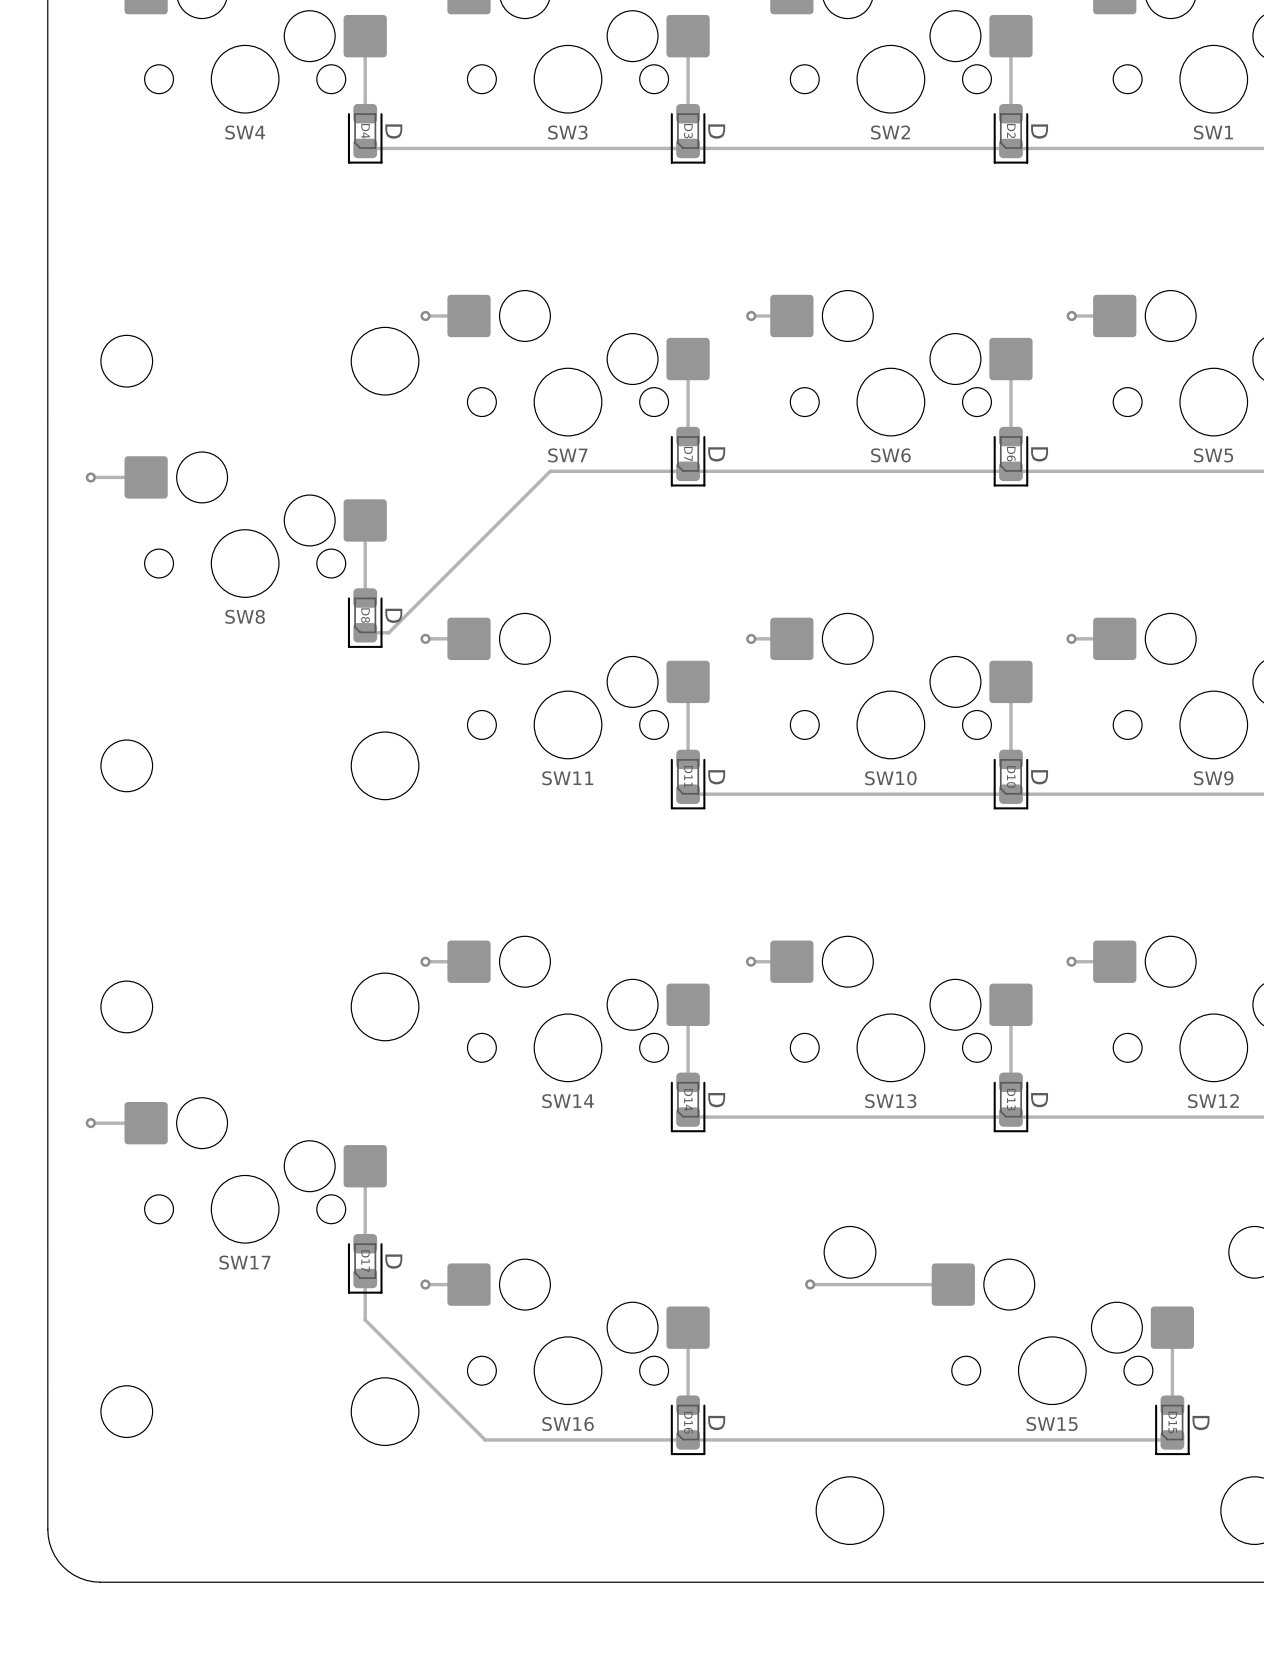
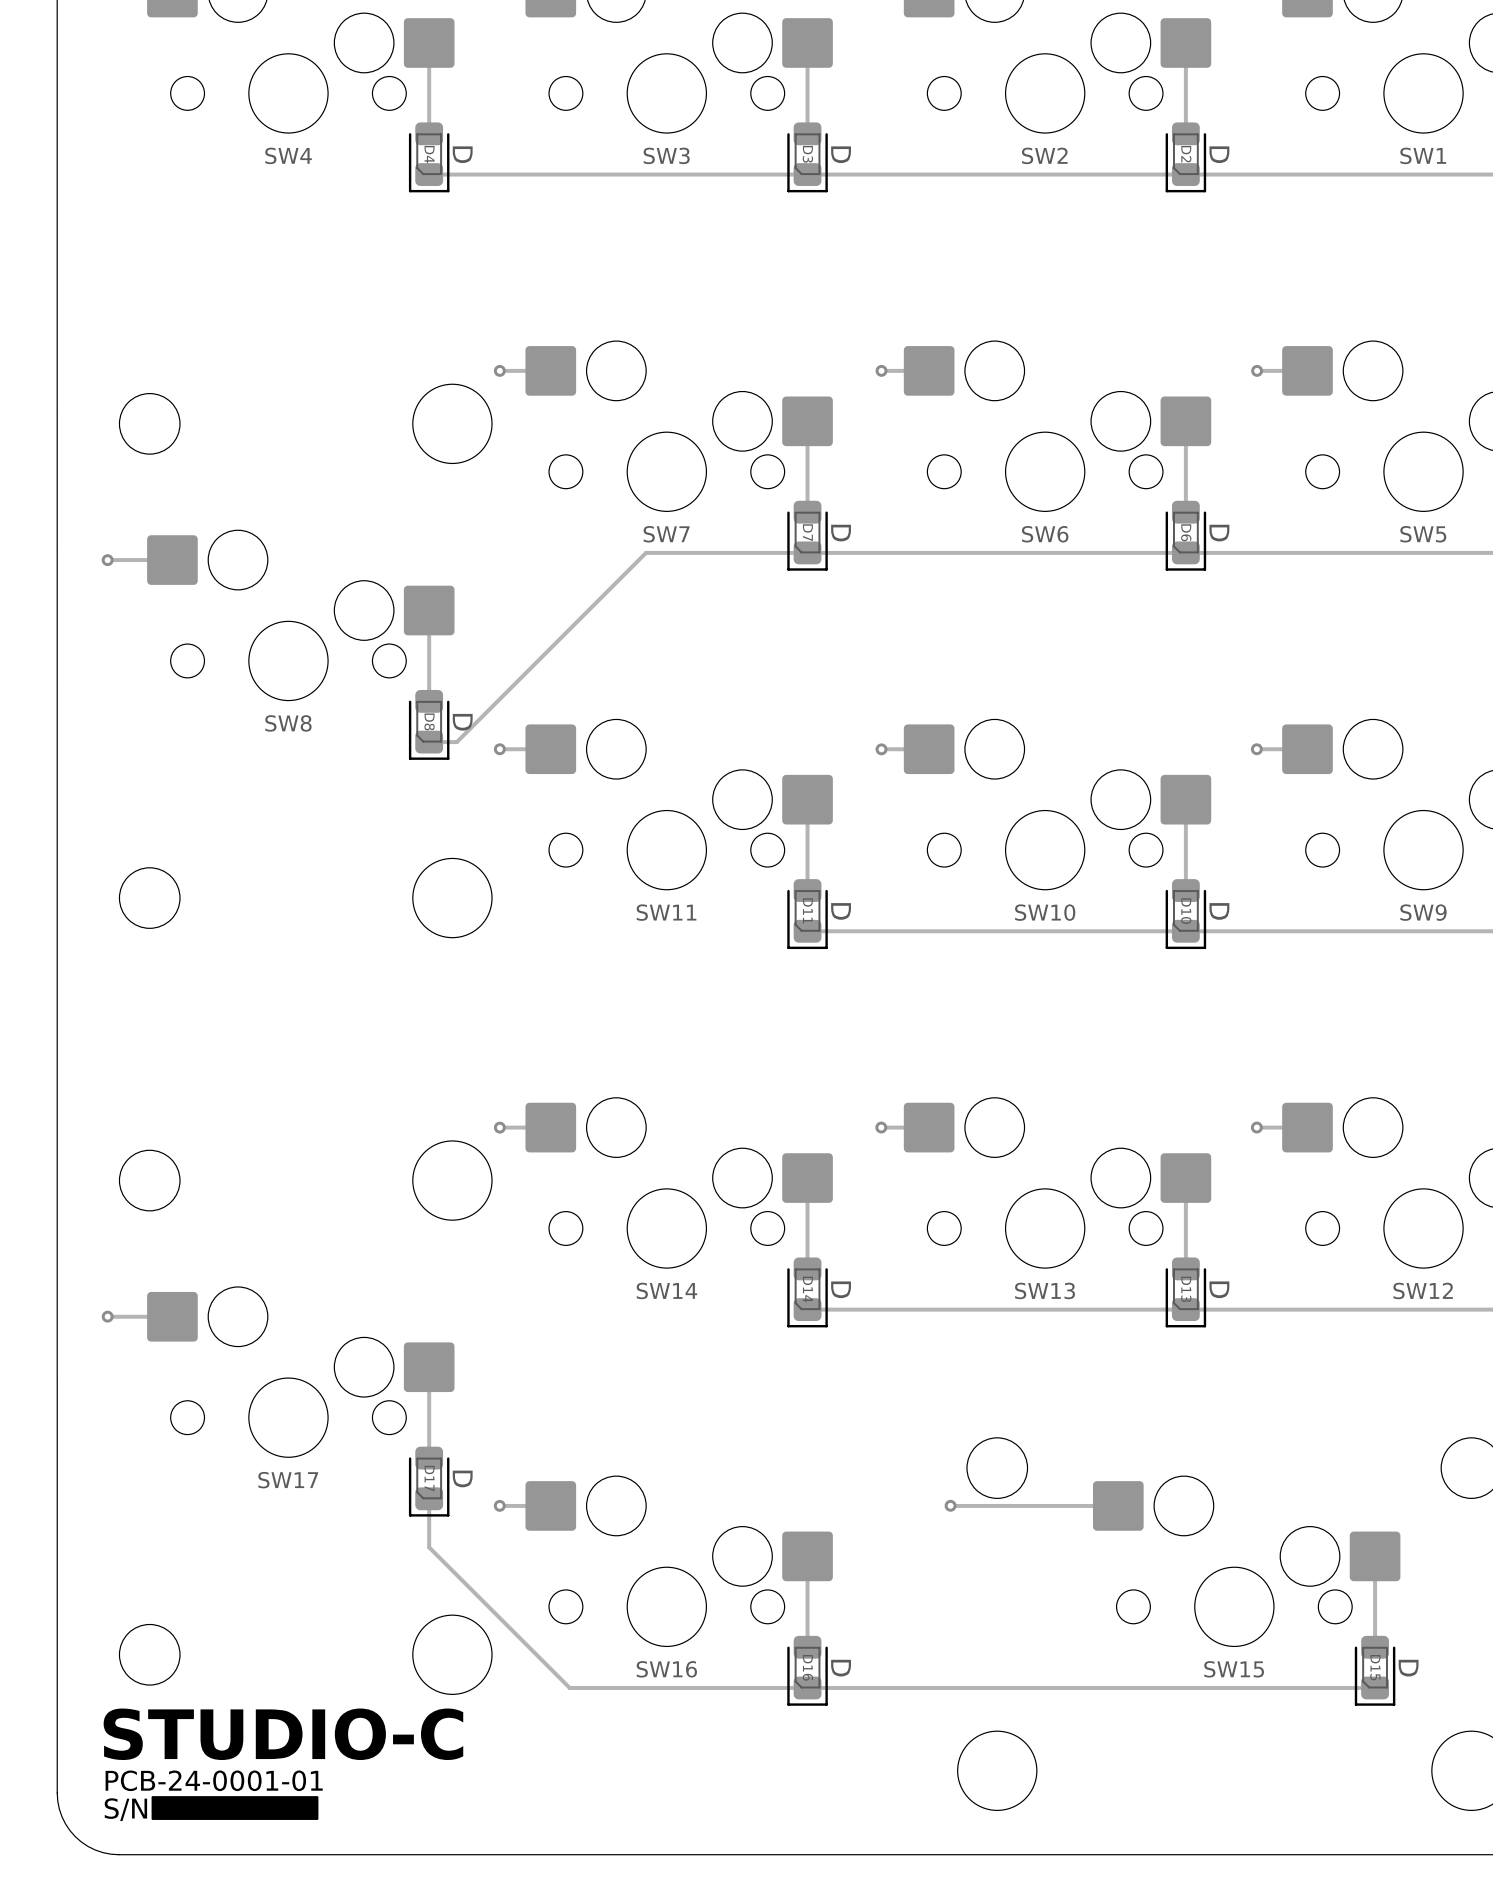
text: none -> STUDIO-C (283, 1734)
text: none -> PCB-24-0001-01 (214, 1780)
drawing: none -> [151, 1796, 319, 1820]
text: none -> S/N (125, 1809)

